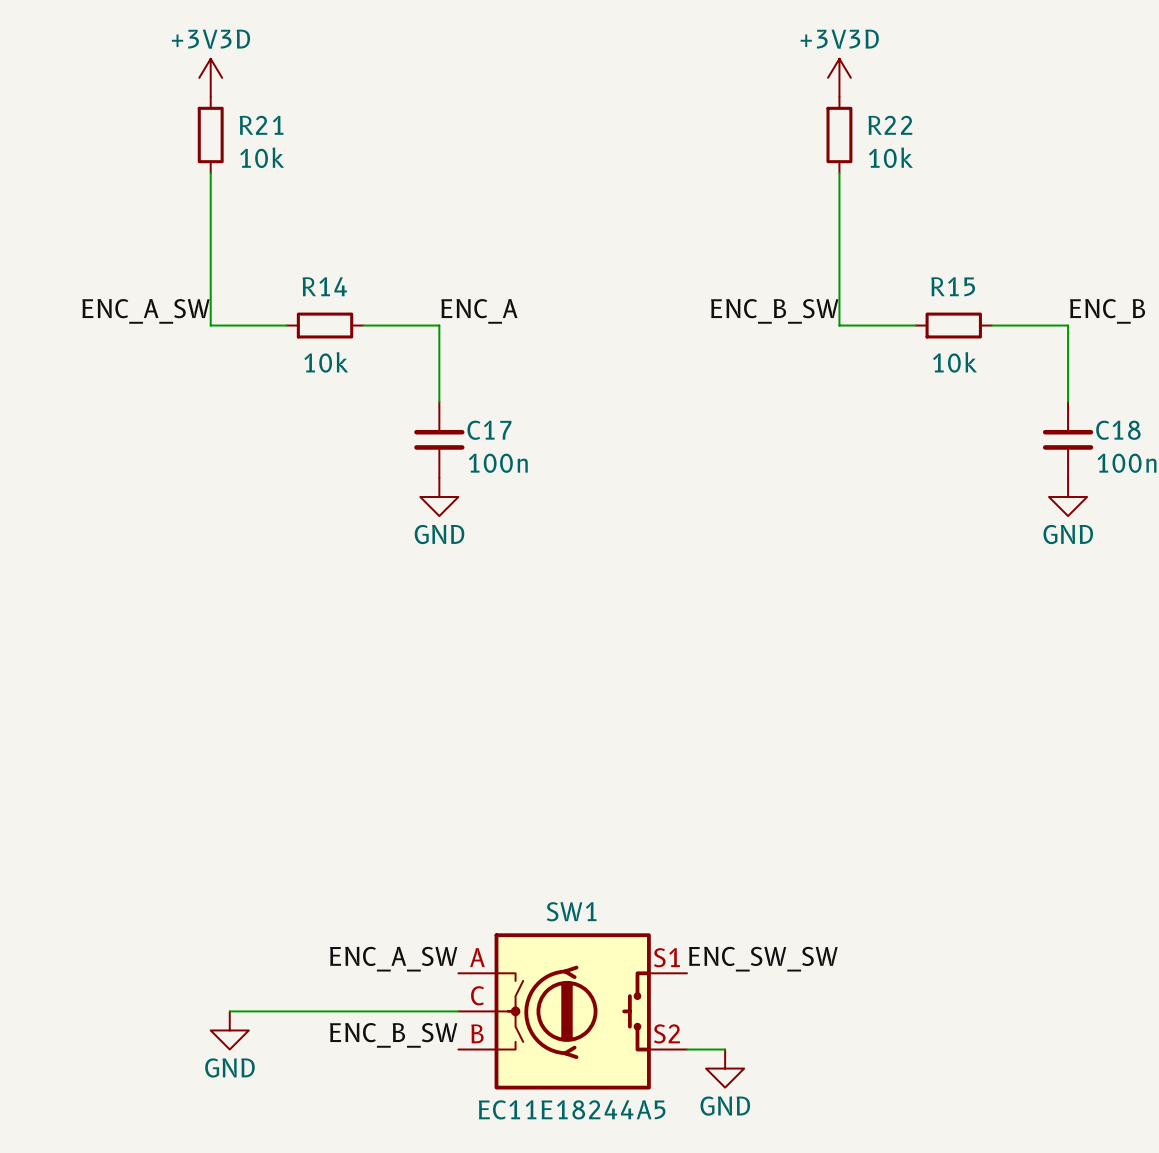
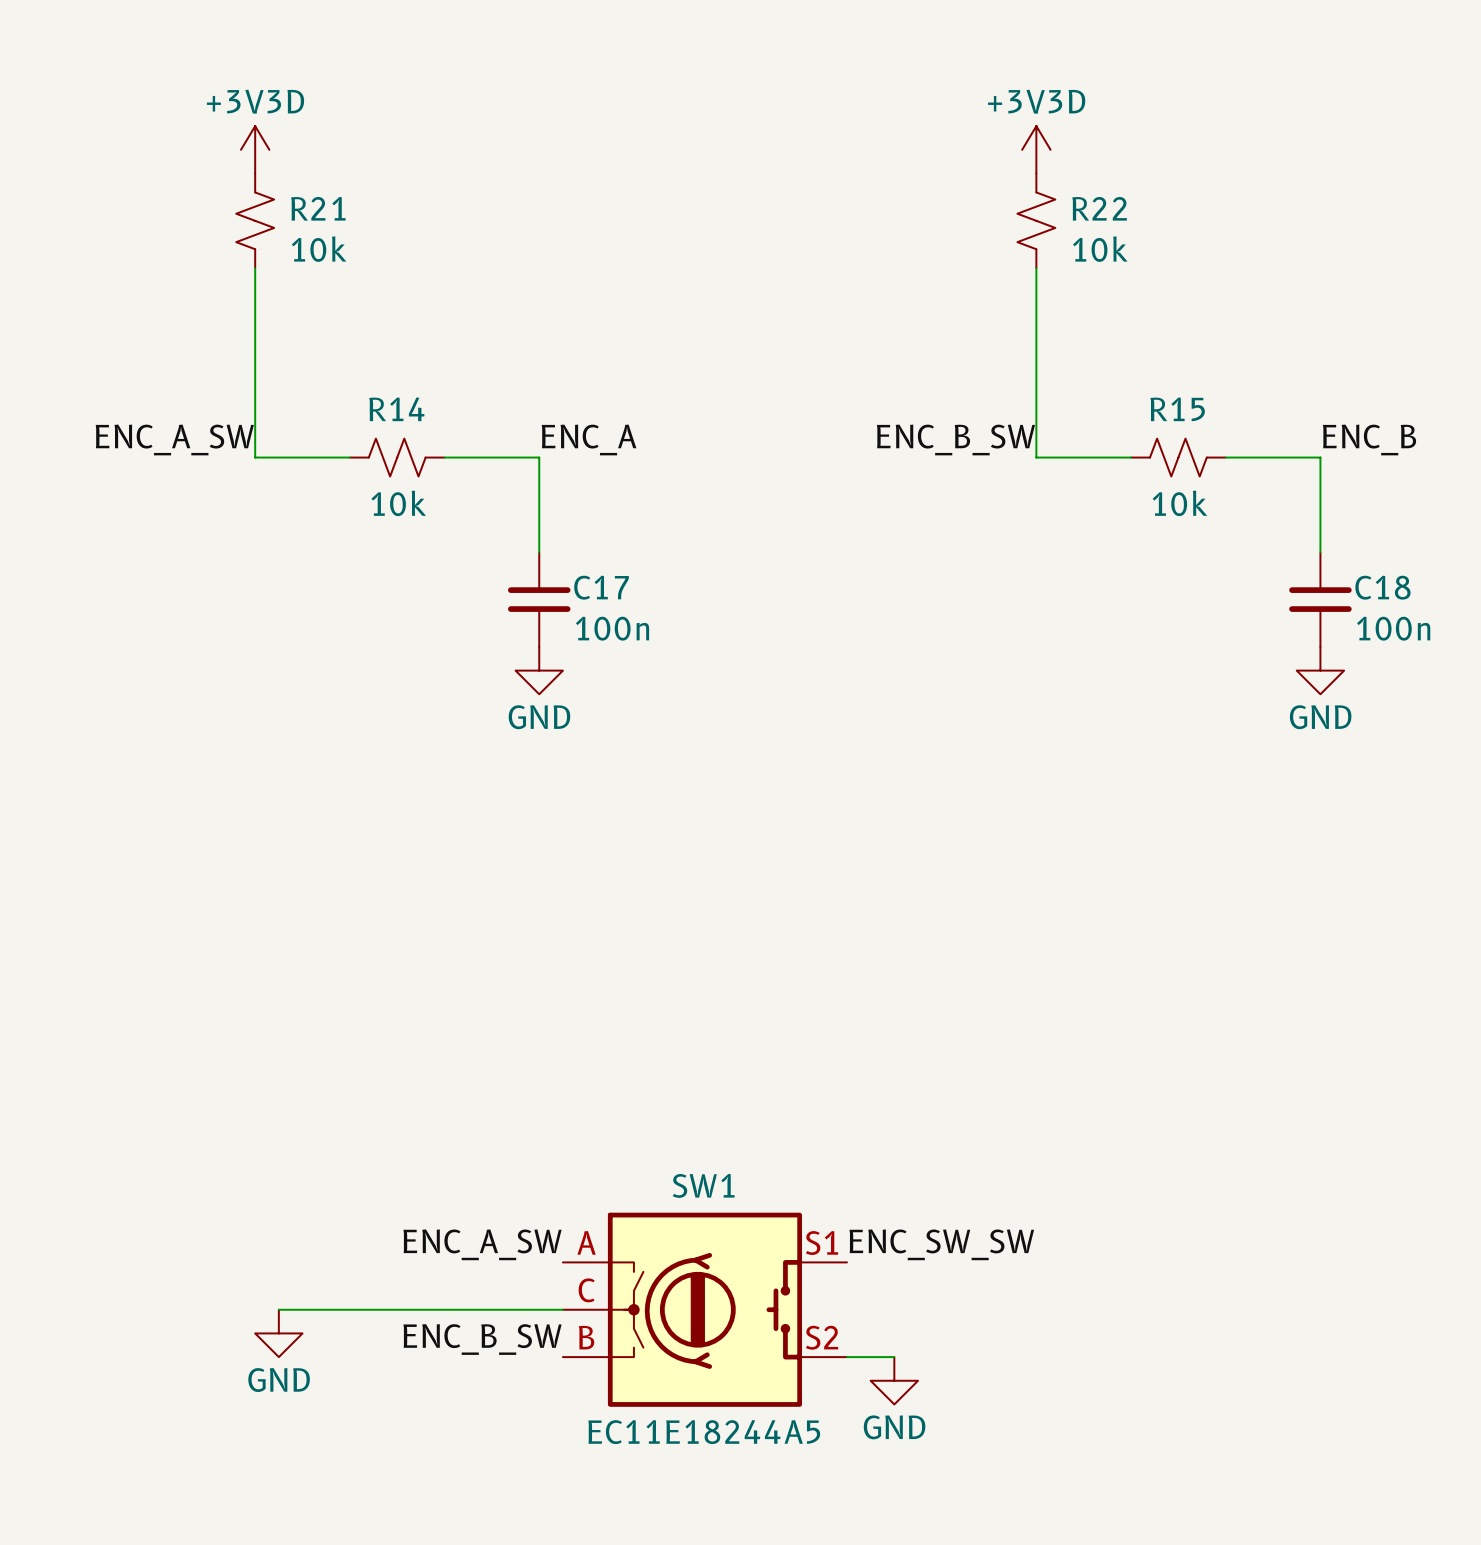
R21 symbol: [197, 96, 224, 174] -> [236, 173, 275, 269]
R22 symbol: [826, 96, 853, 174] -> [1017, 173, 1056, 269]
R14 symbol: [286, 312, 364, 339] -> [349, 438, 445, 477]
R15 symbol: [915, 312, 992, 339] -> [1131, 438, 1226, 477]

